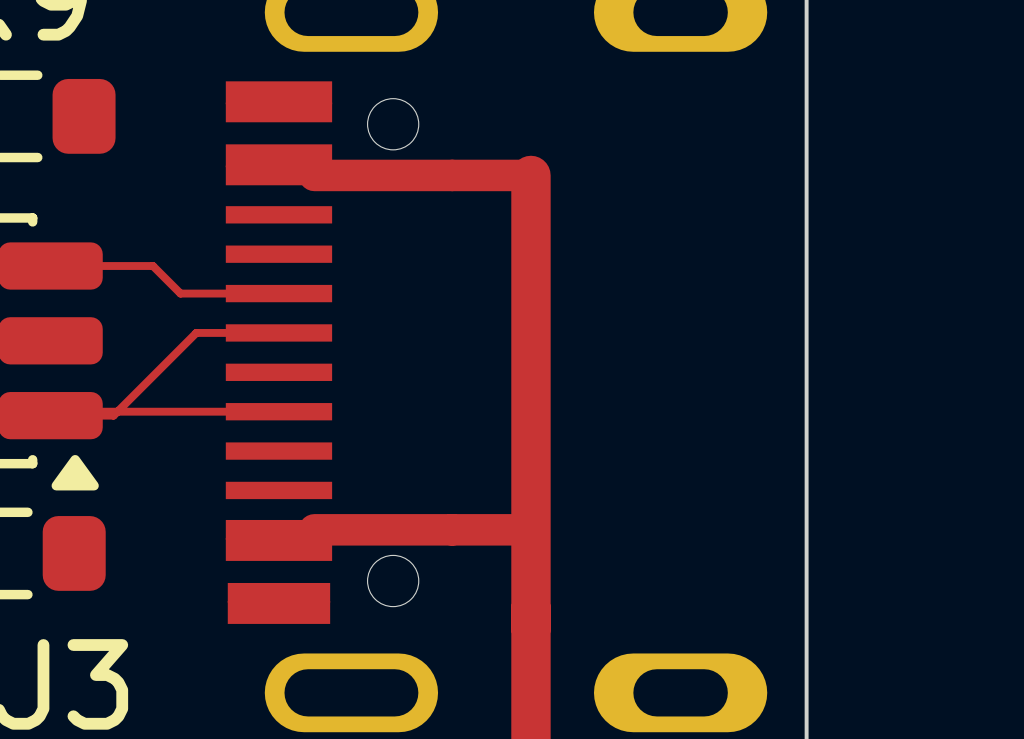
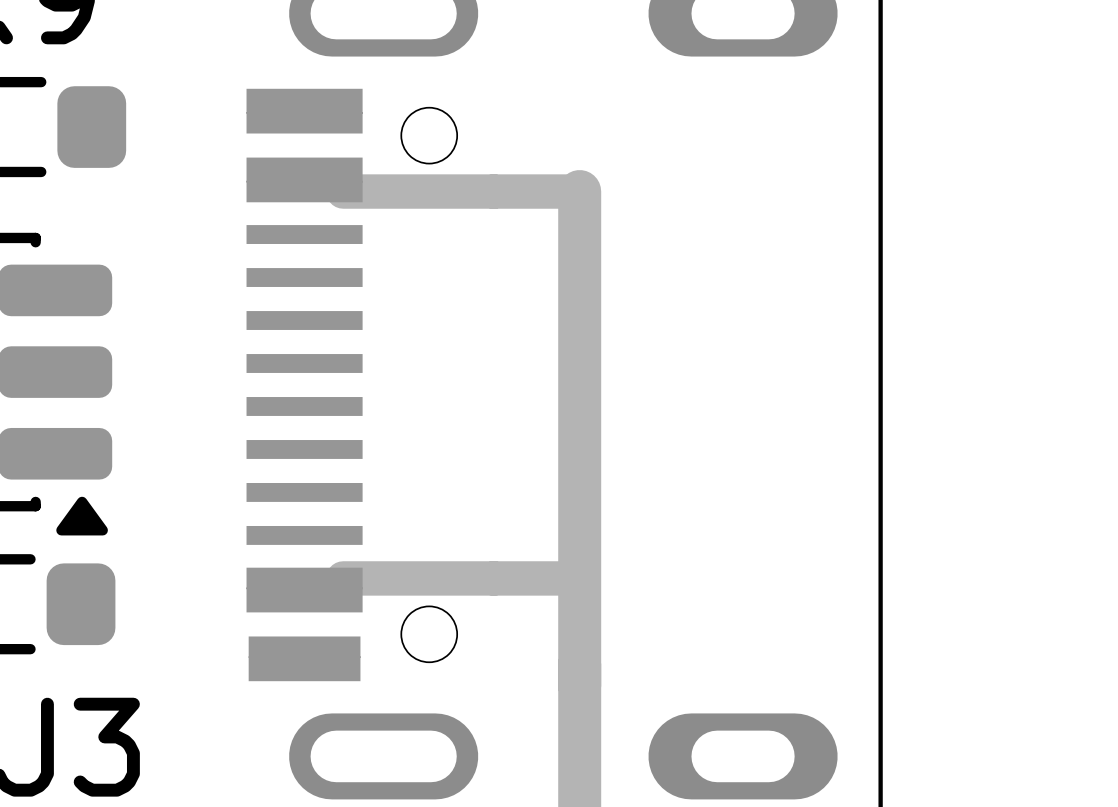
track: (50, 266) (152, 266) (180, 293) (278, 293) -> none
track: (278, 332) (196, 332) (113, 415) (50, 415) (54, 411) (278, 411) -> none

